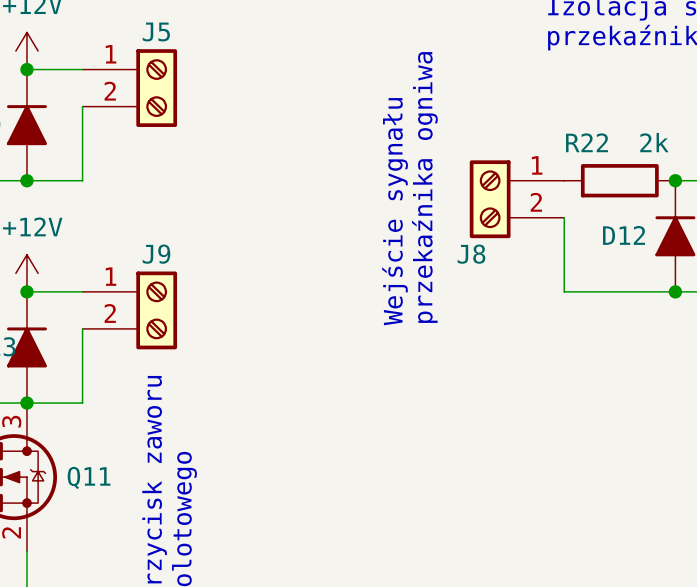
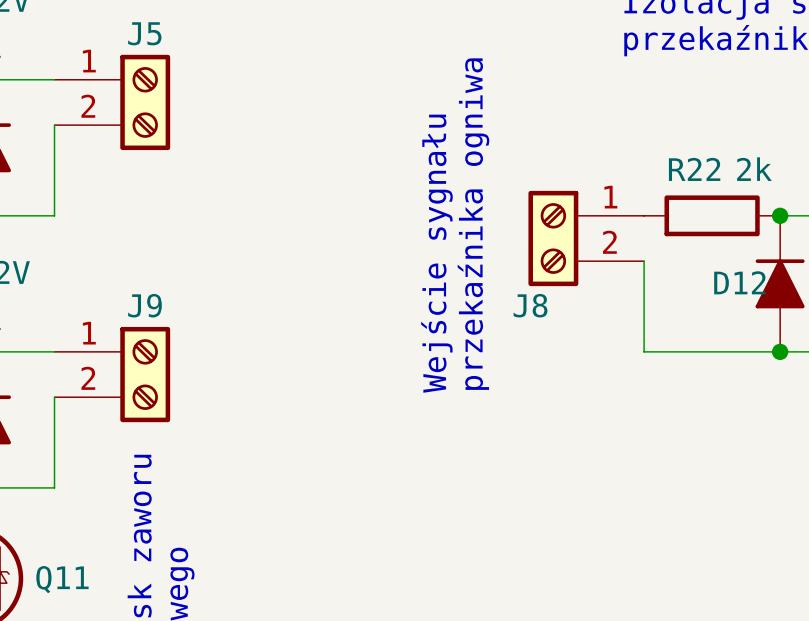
R22 name position: R22 (587, 142) -> R22 (694, 169)
D12 name position: D12 (624, 235) -> D12 (739, 282)

